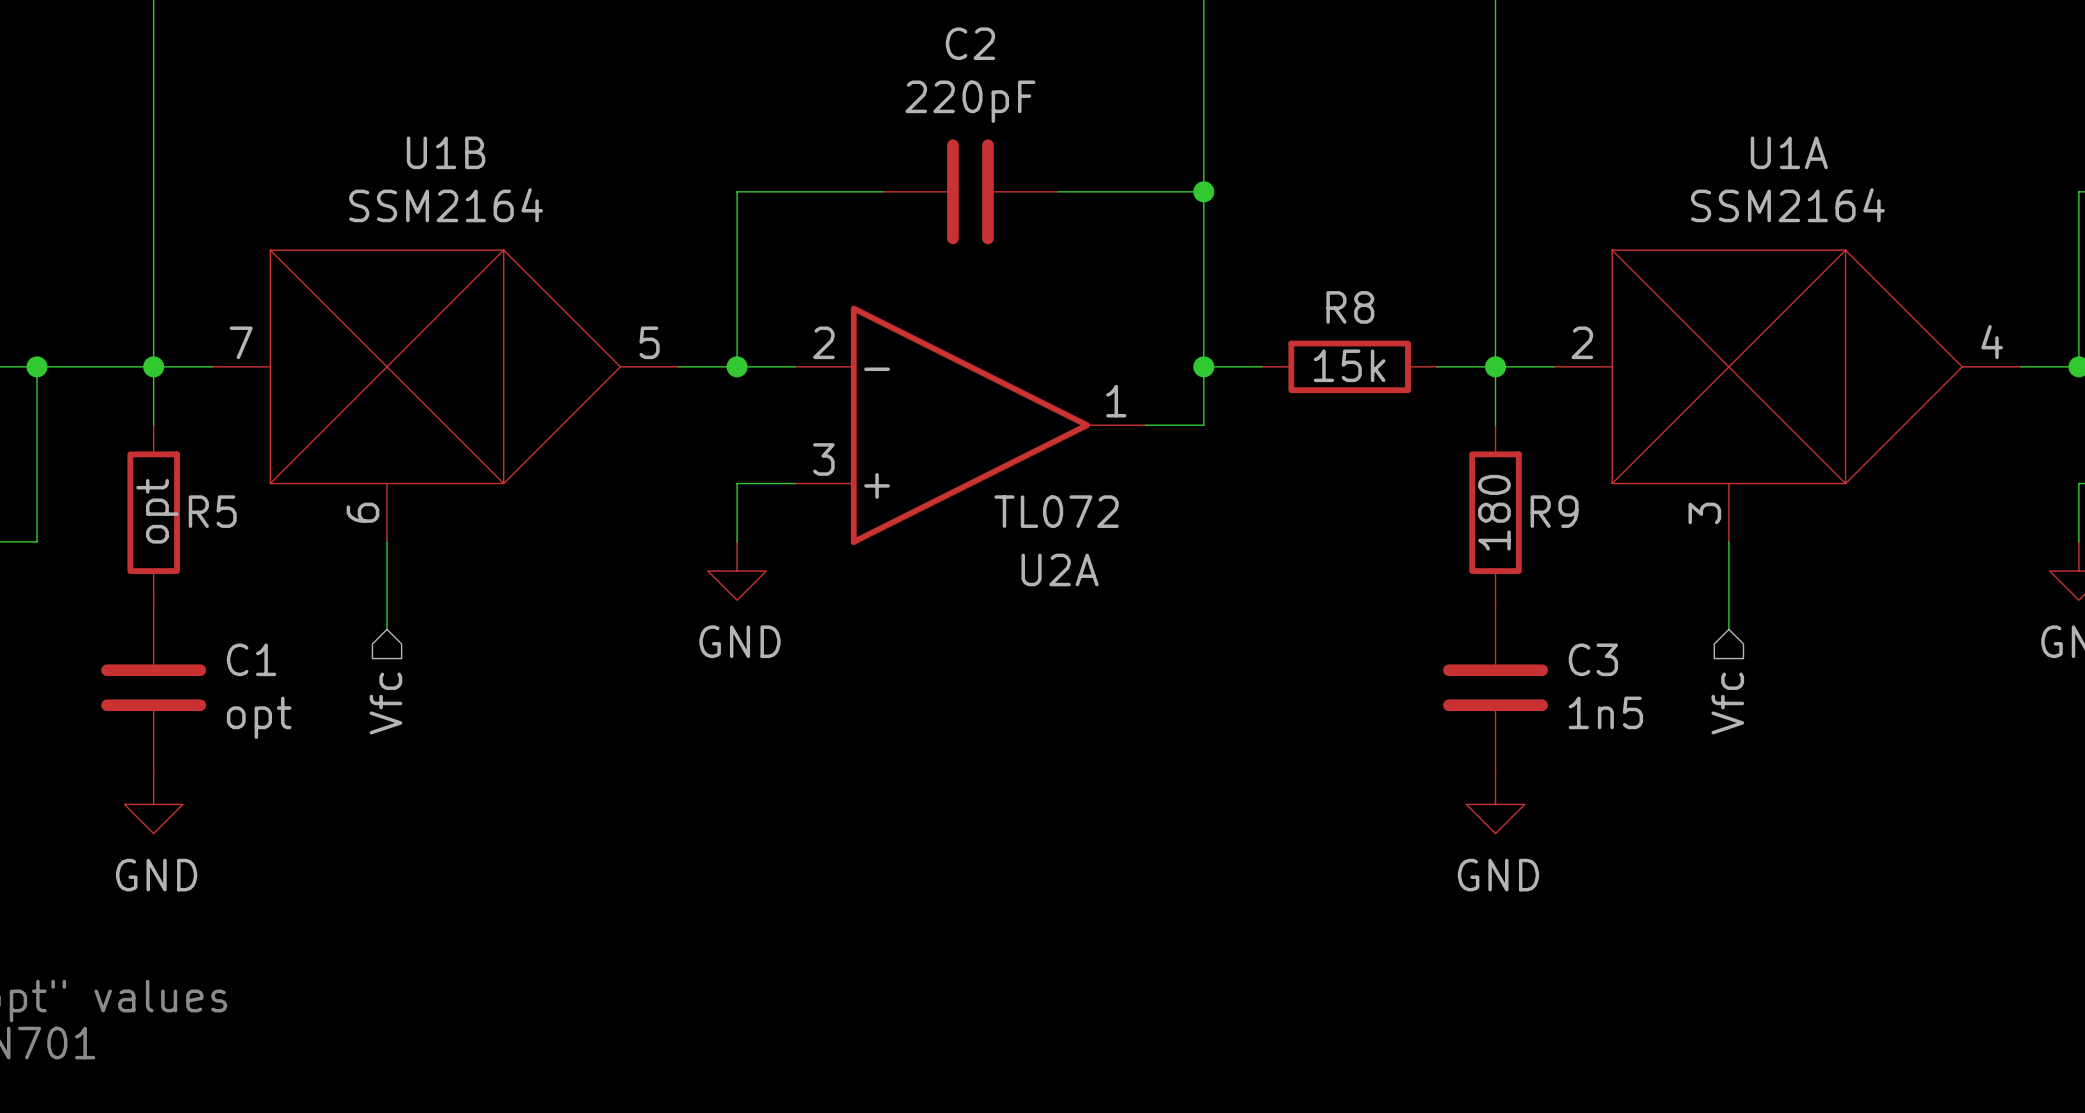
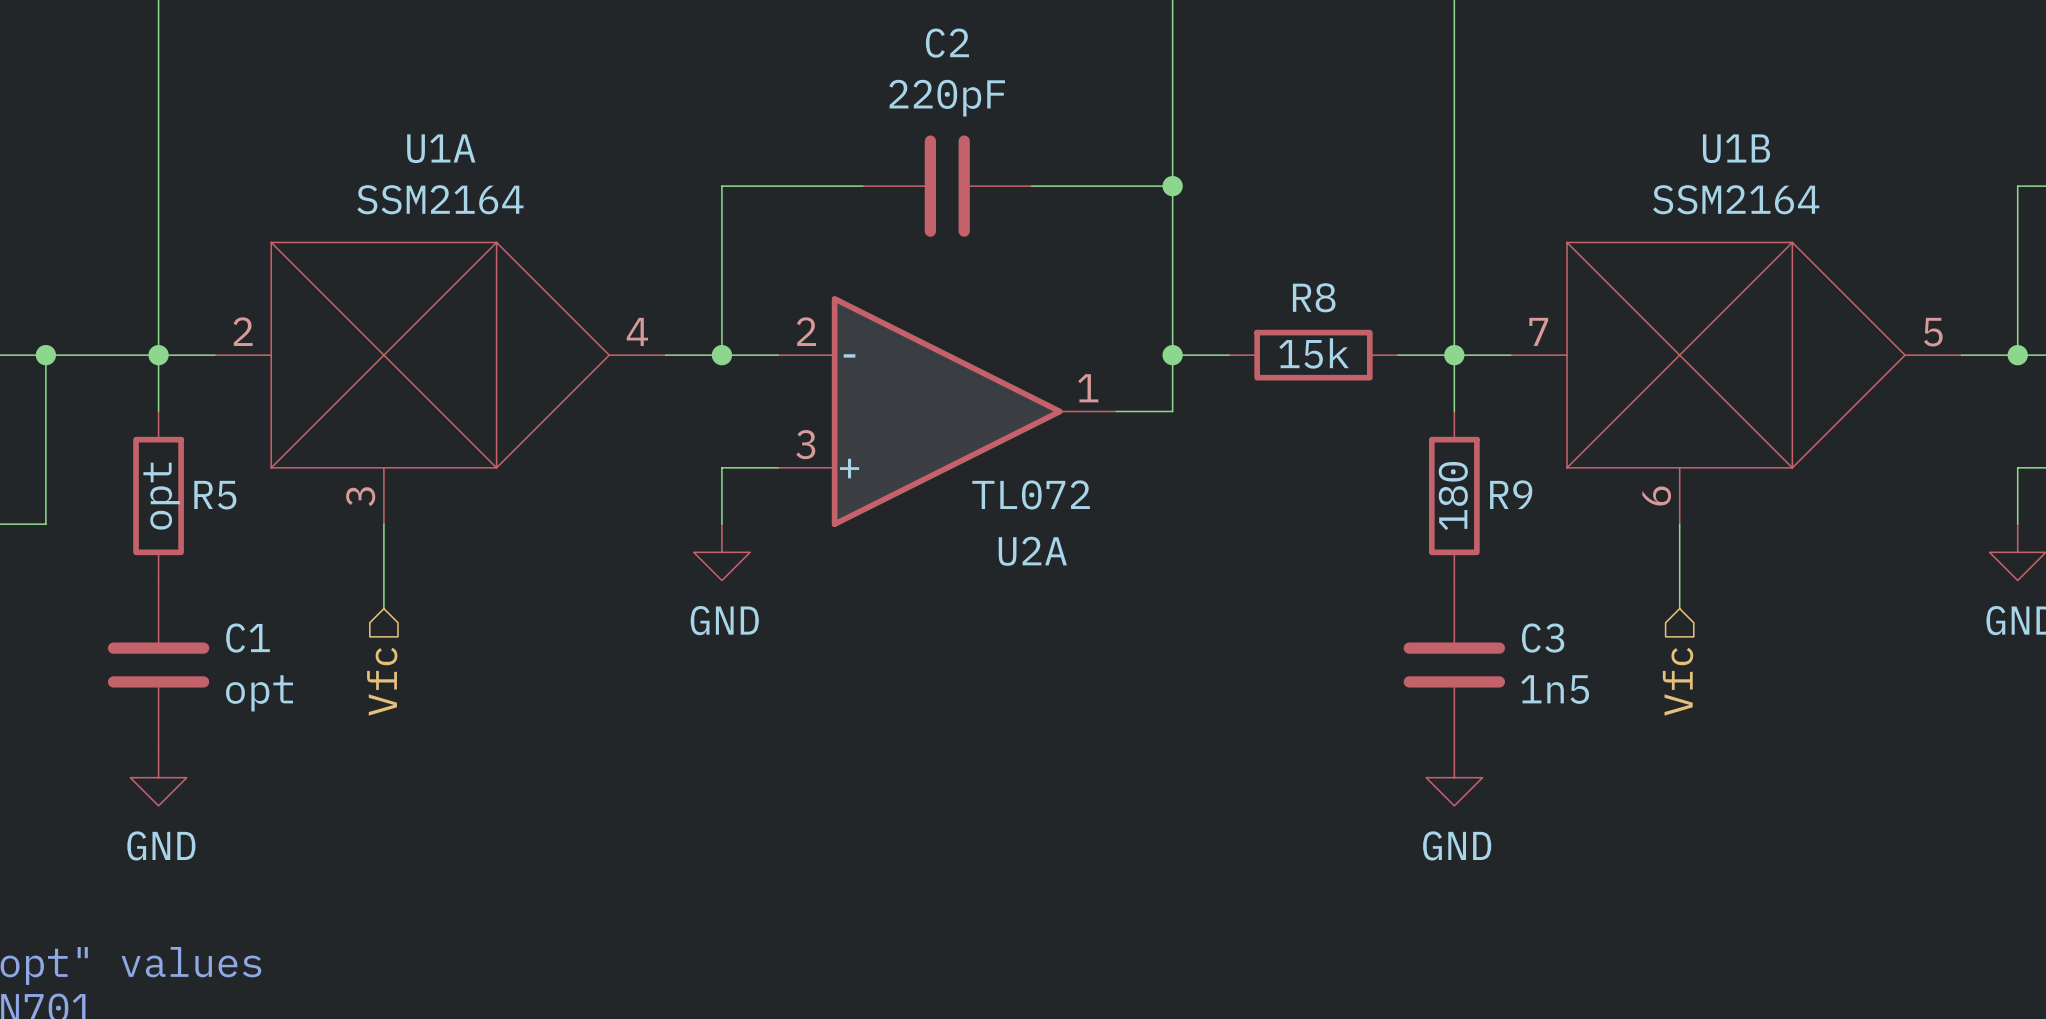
U1B position: (445, 396) -> (1736, 383)
U1A position: (1787, 396) -> (440, 383)

